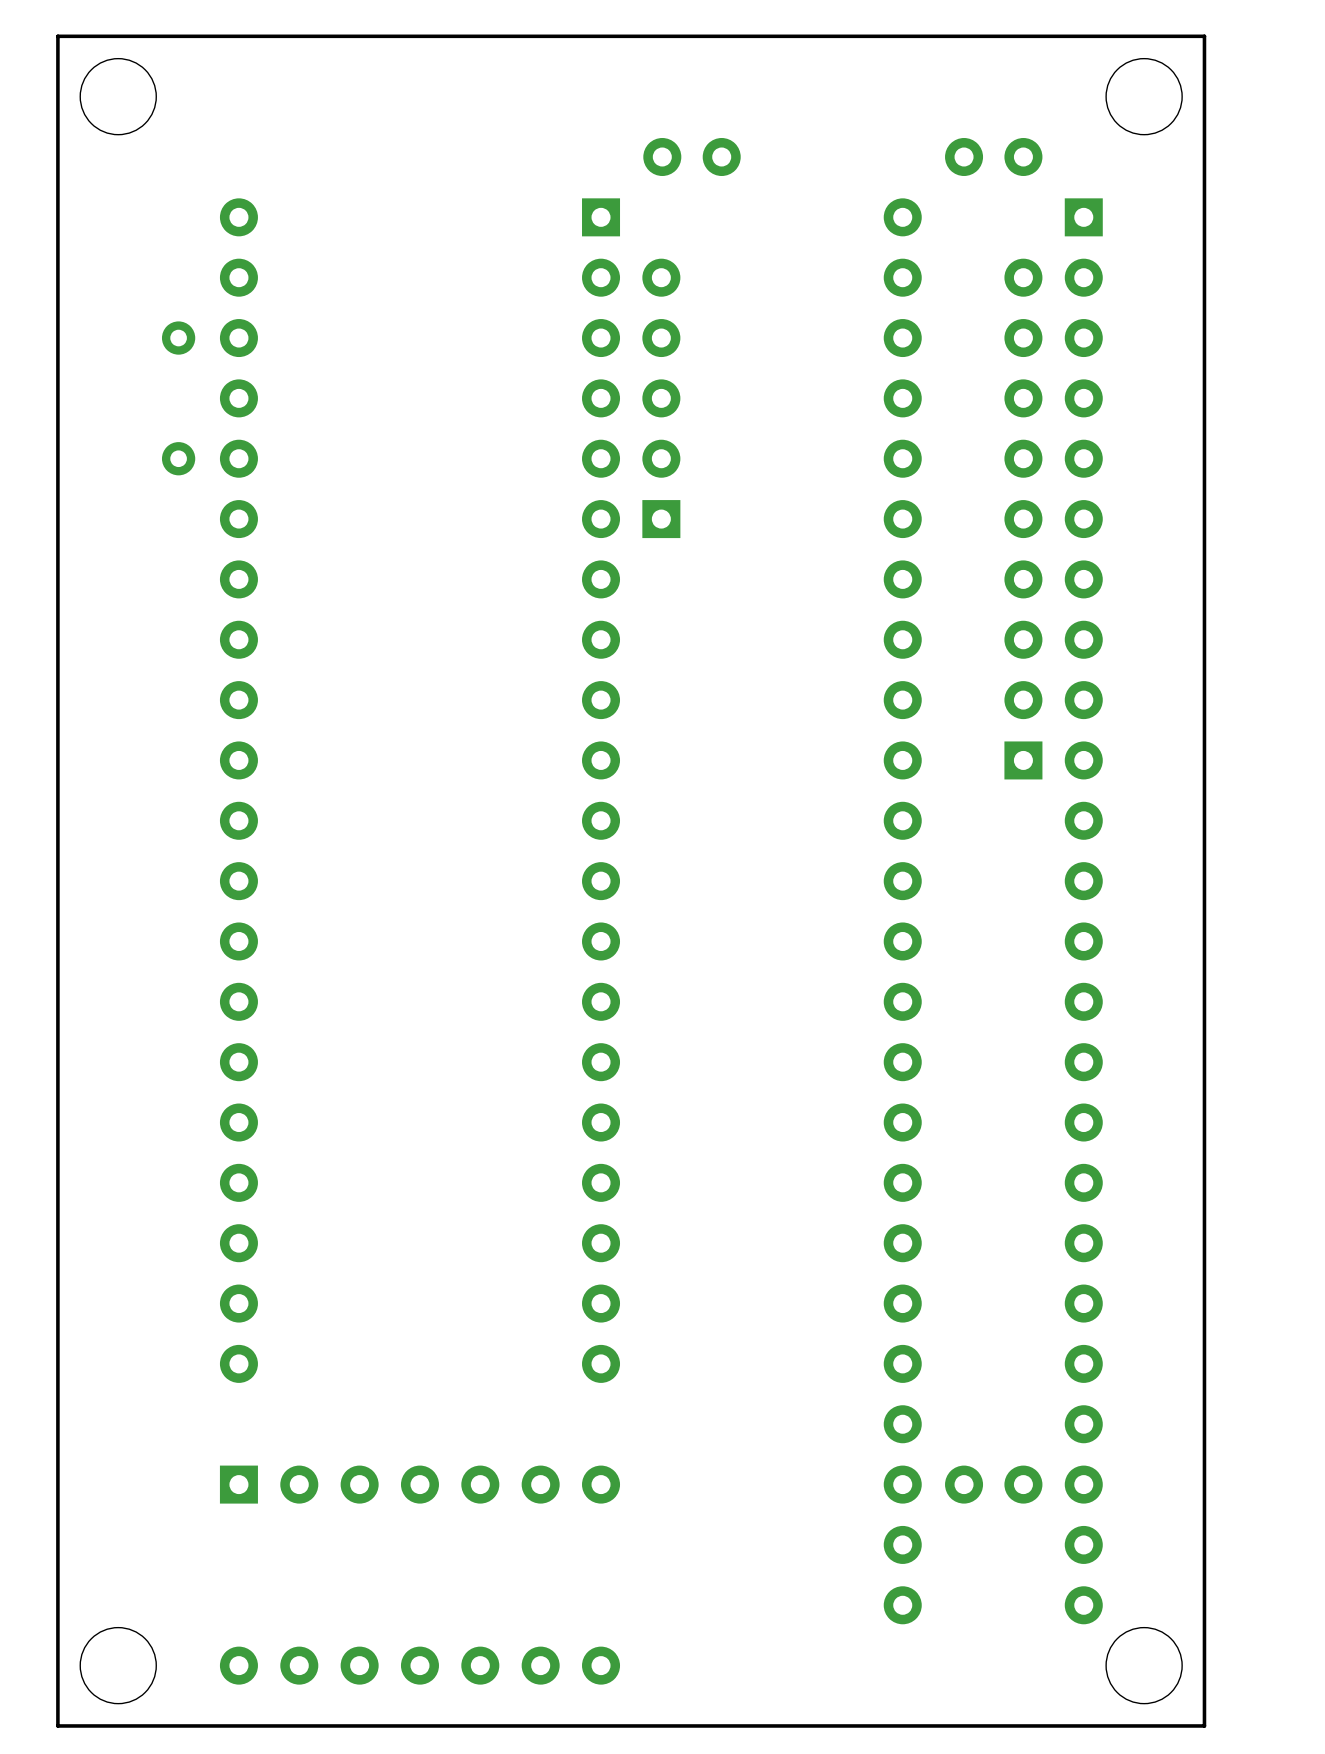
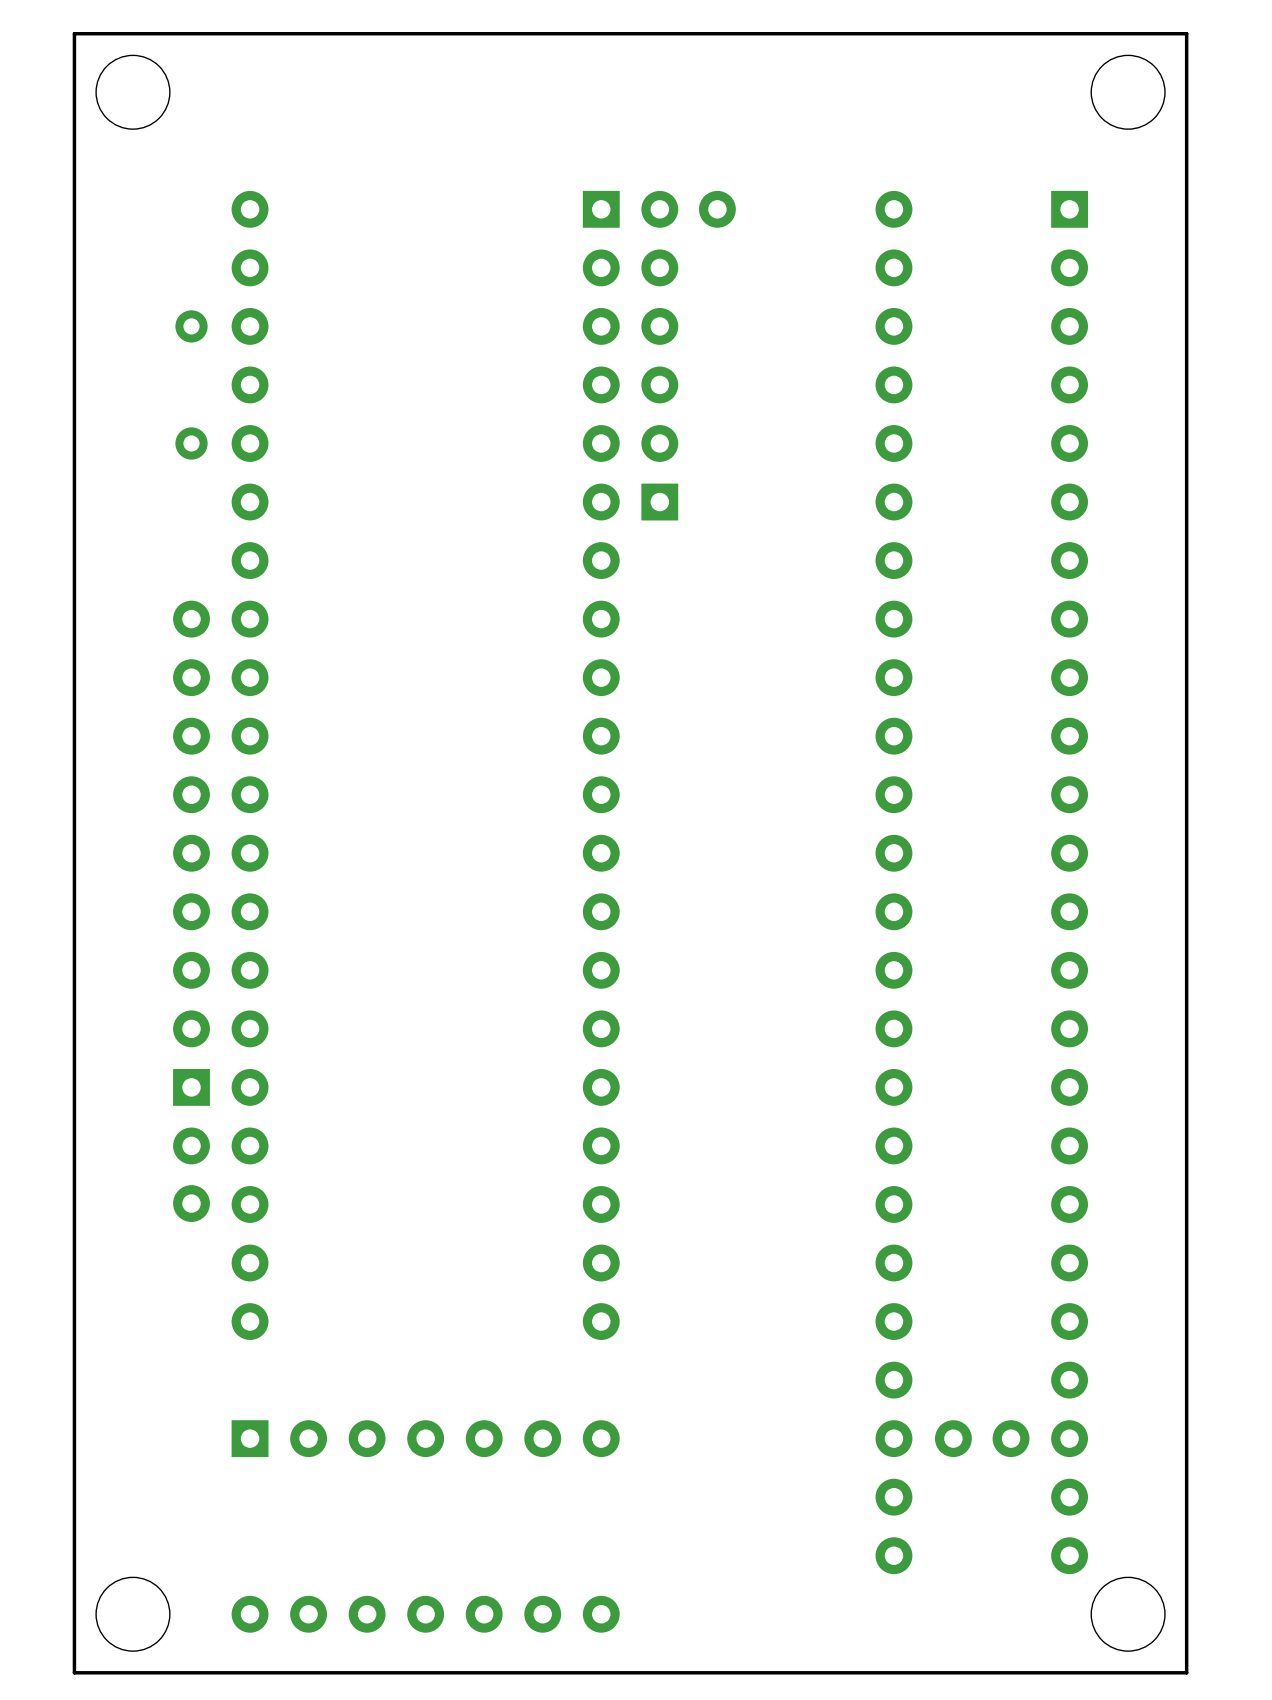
part position: (692, 157) -> (688, 209)
part: (993, 157) -> none
part: (1023, 519) -> none
part: none -> (191, 853)
part: none -> (191, 1174)

